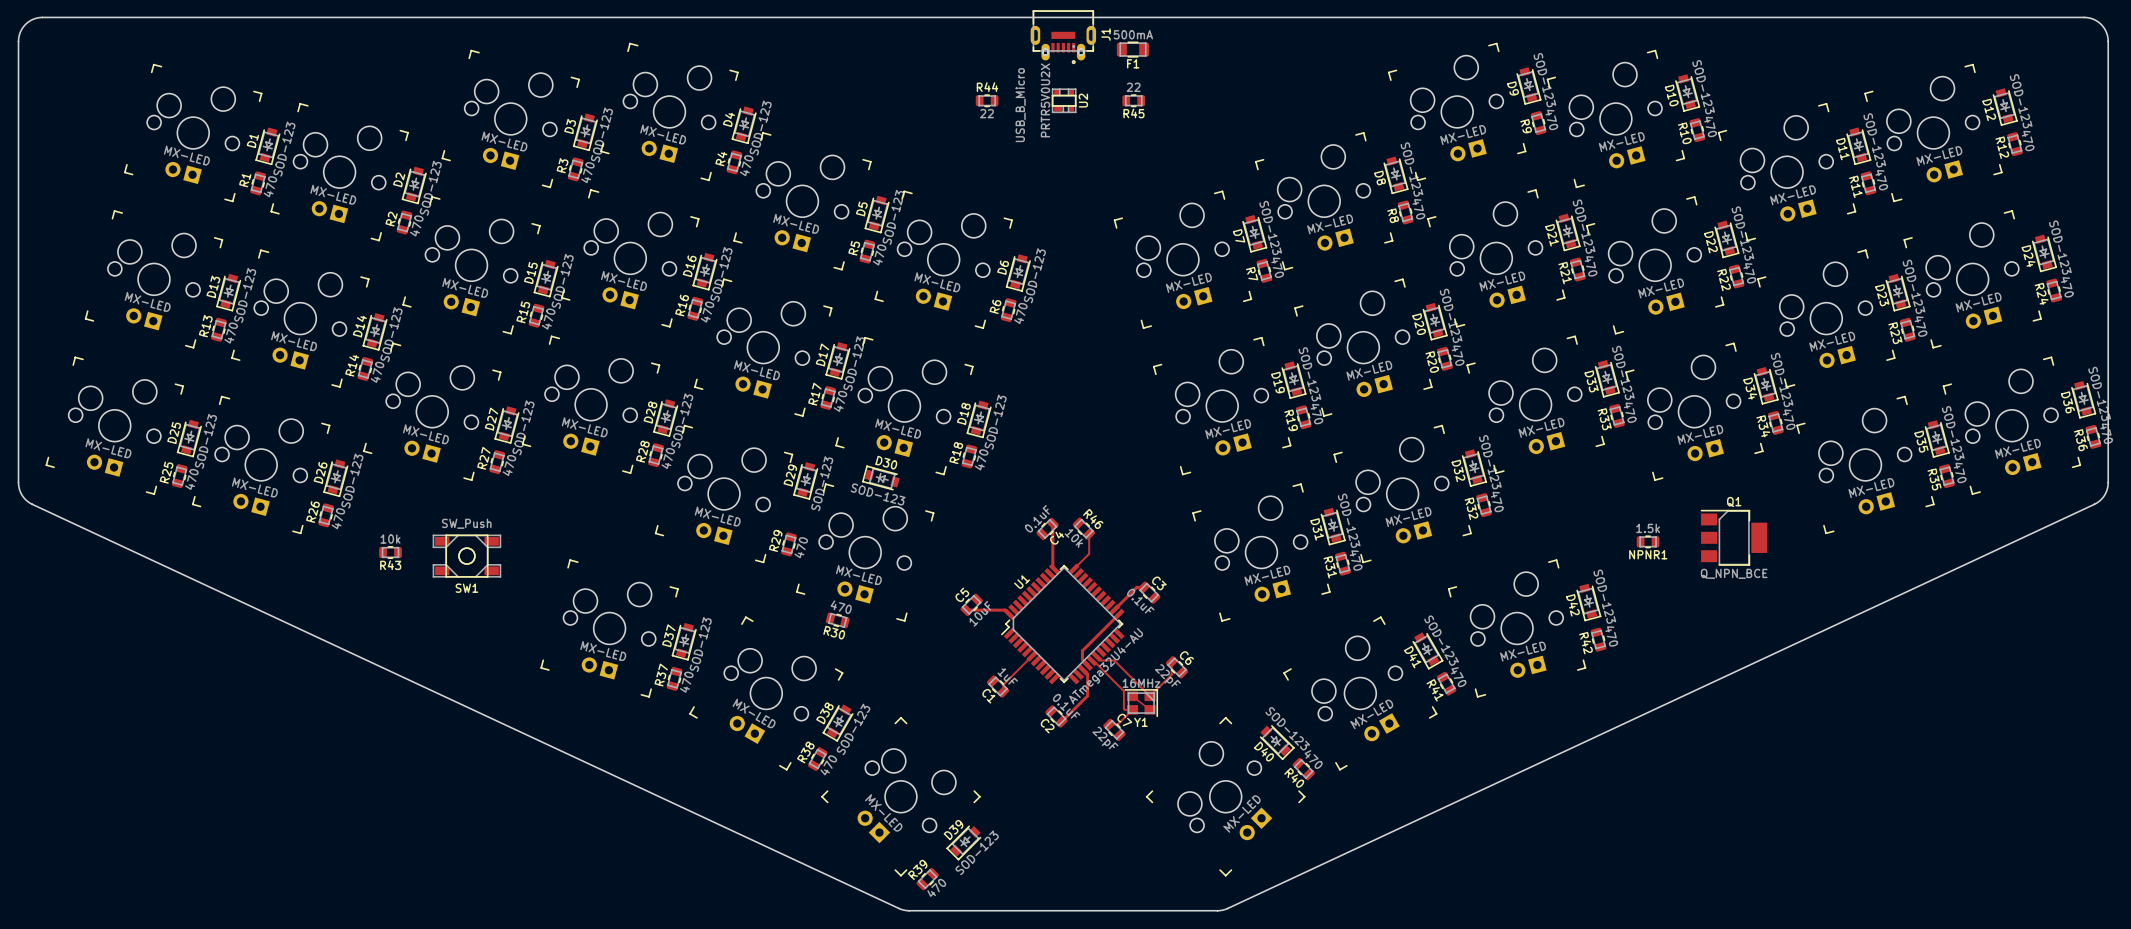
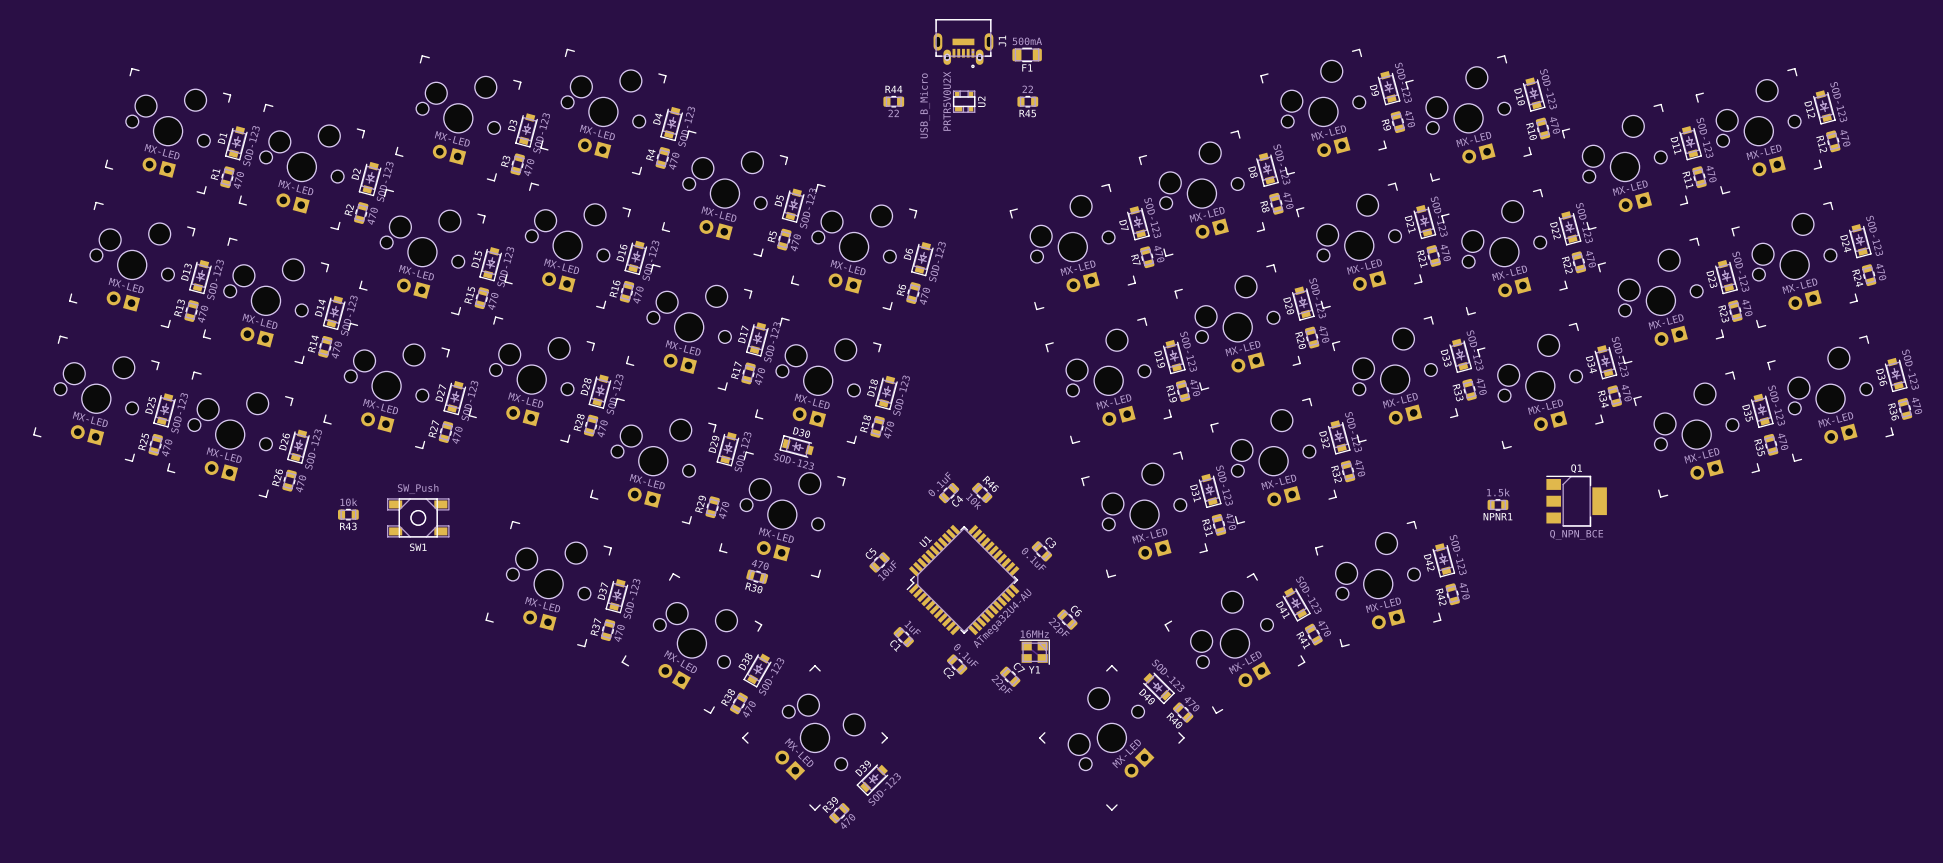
board edge: (42, 17) (2090, 18) (2103, 26) (2108, 41) (2107, 488) (2102, 497) (2094, 504) (1225, 909) (903, 910) (25, 499) (19, 490) (18, 482) (18, 41) (20, 32) (25, 24) (33, 19) (42, 17) -> none
track: (1052, 523) (1052, 567) (1054, 569) -> none
track: (1089, 533) (1089, 553) (1073, 569) -> none
track: (1143, 587) (1136, 587) (1114, 609) -> none
track: (966, 610) (1005, 610) (1009, 614) -> none
track: (1118, 614) (1082, 650) (1082, 659) (1087, 665) -> none
track: (1032, 656) (1003, 684) (1003, 691) -> none
track: (1096, 656) (1100, 660) (1114, 660) (1150, 696) (1171, 674) (1171, 662) -> none
track: (1091, 660) (1123, 691) (1123, 708) (1132, 709) (1117, 724) (1109, 724) -> none
track: (1082, 669) (1087, 674) (1087, 695) (1061, 721) -> none

